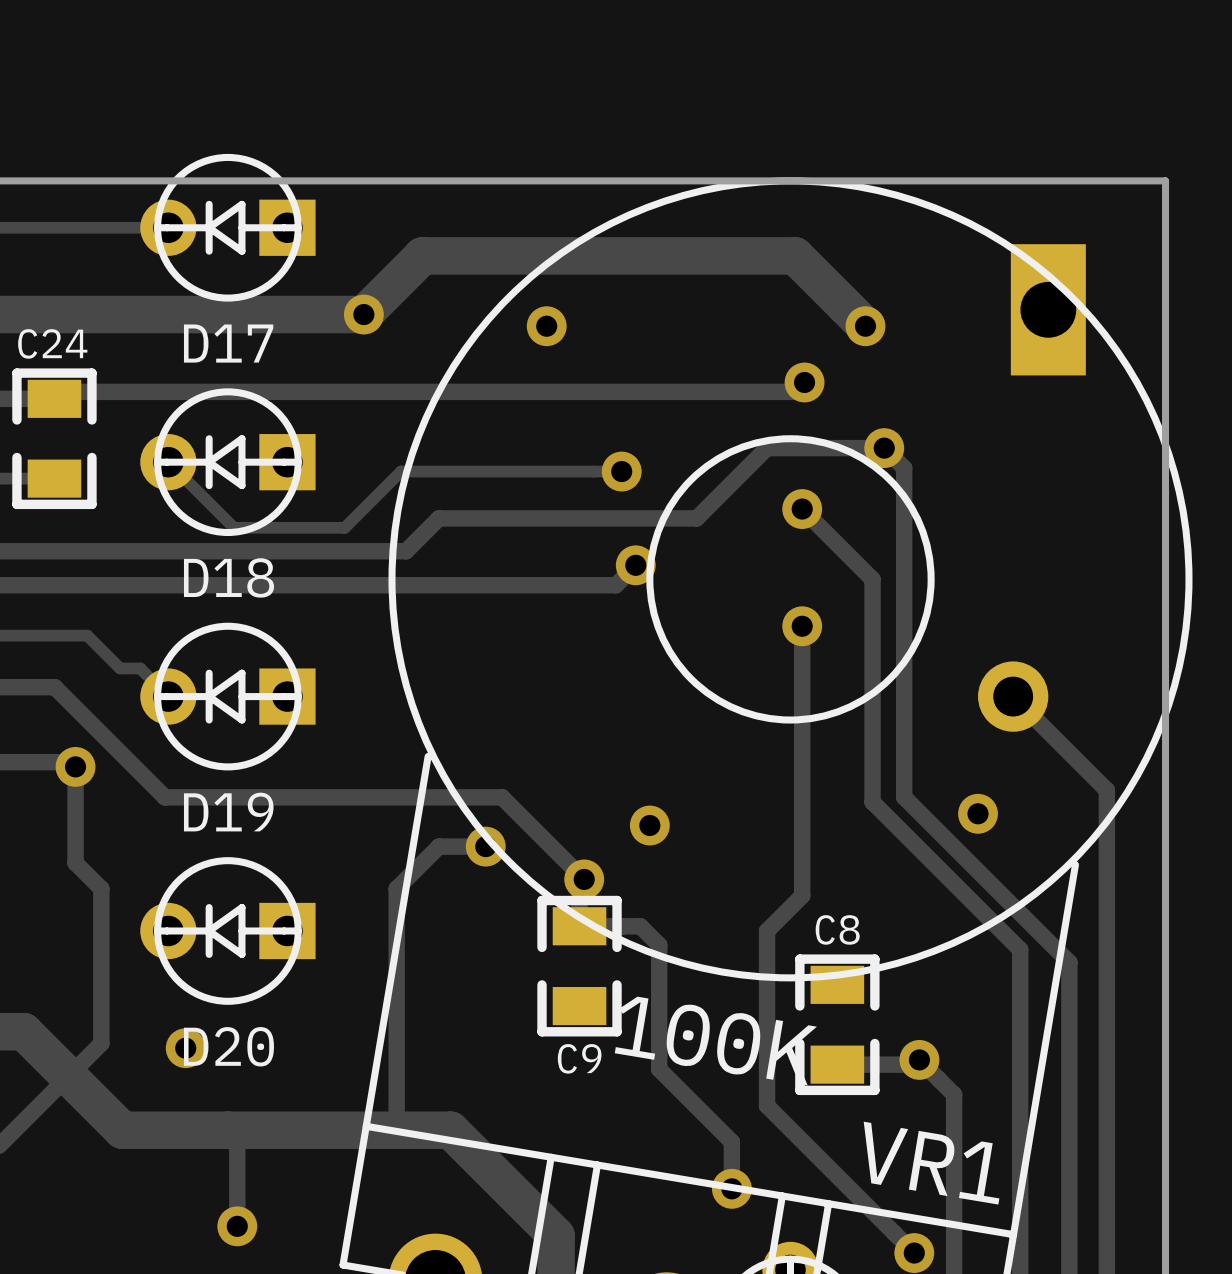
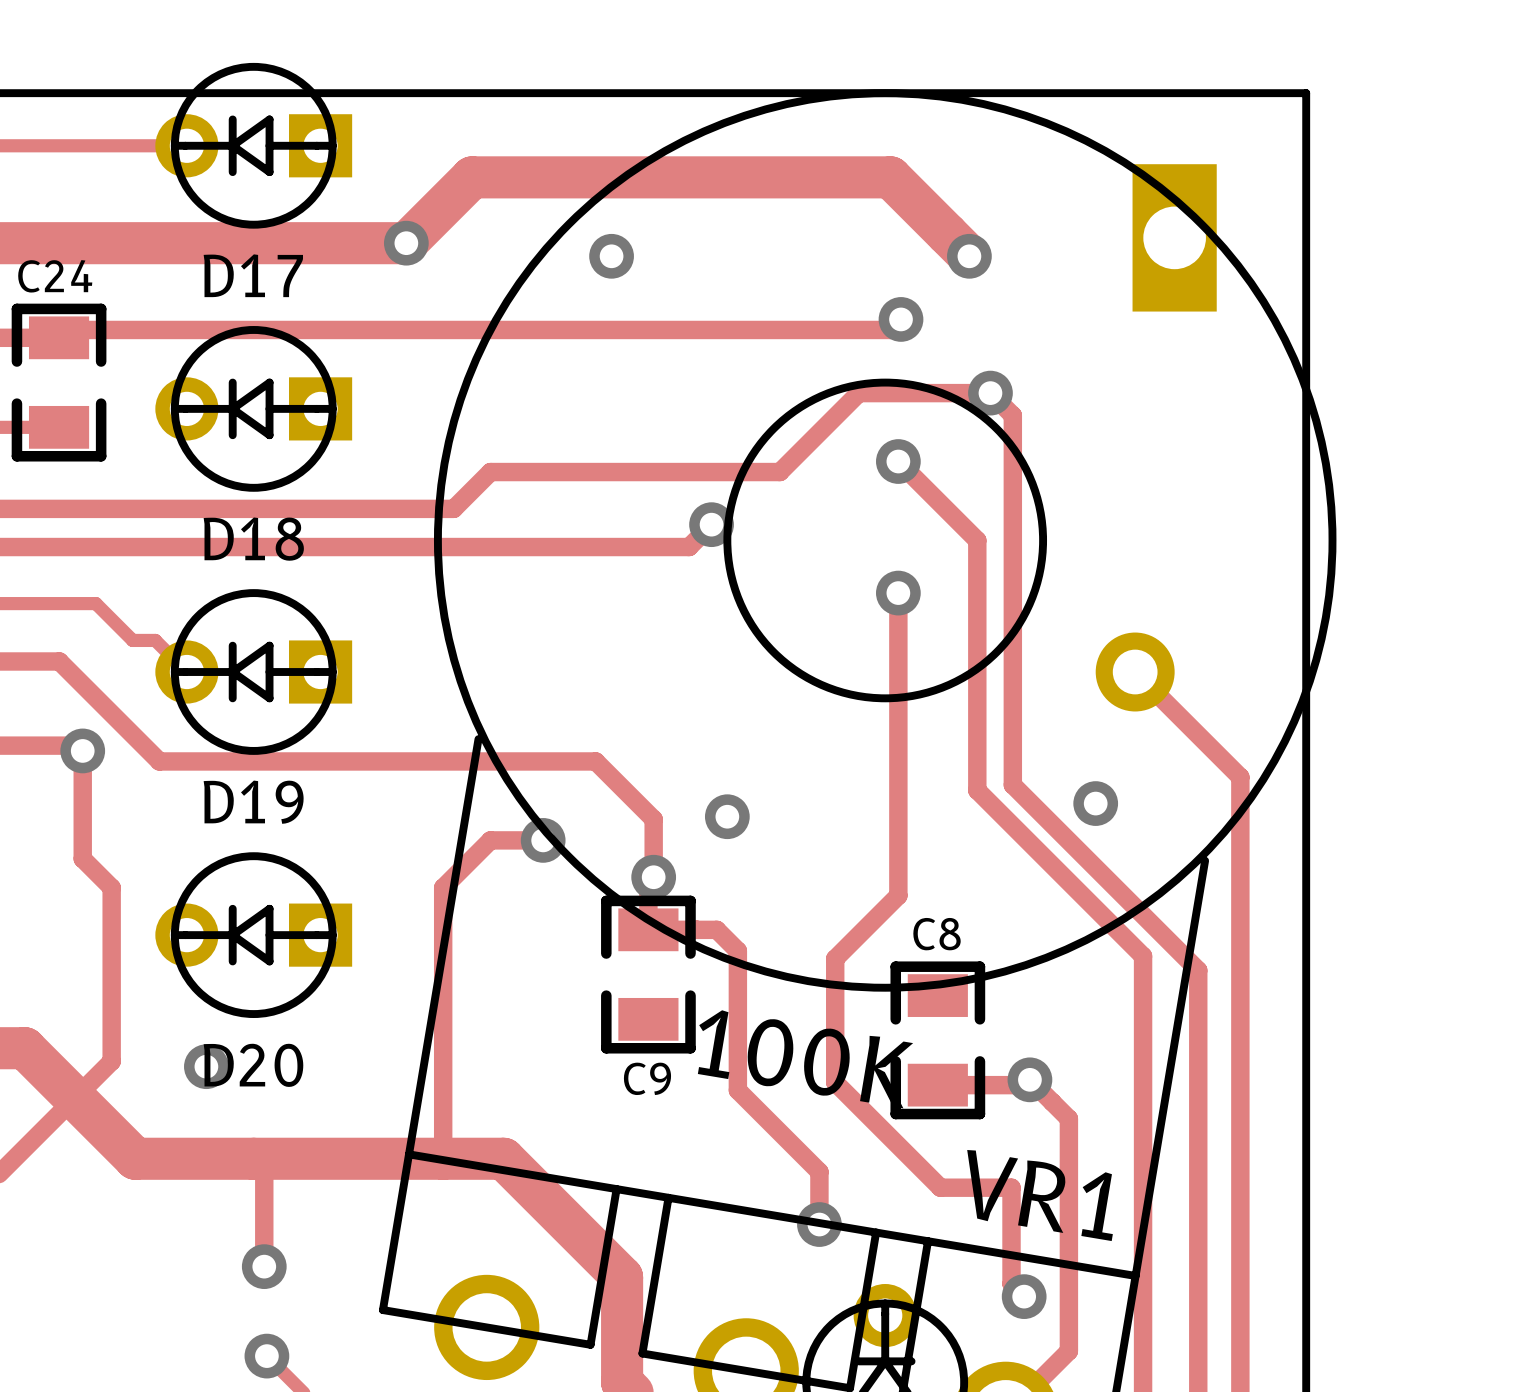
track: (168, 462) (234, 527) (344, 527) (401, 471) (621, 471) -> none
via: (621, 471) -> none
track: (143, 776) (164, 797) (502, 797) (584, 879) -> (159, 761) (595, 761) (653, 819) (653, 877)
track: (767, 930) (767, 1105) (903, 1241) -> (858, 935) (835, 958) (835, 1082) (940, 1187) (1011, 1187) (1011, 1283)

